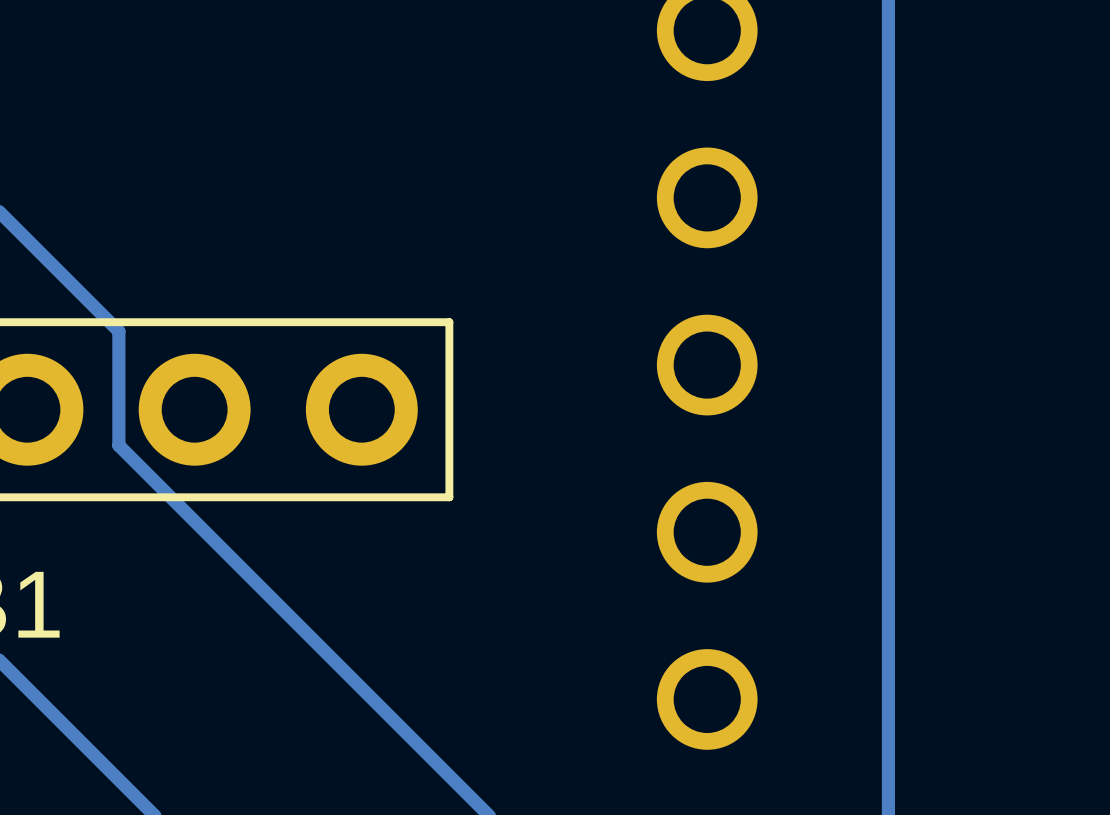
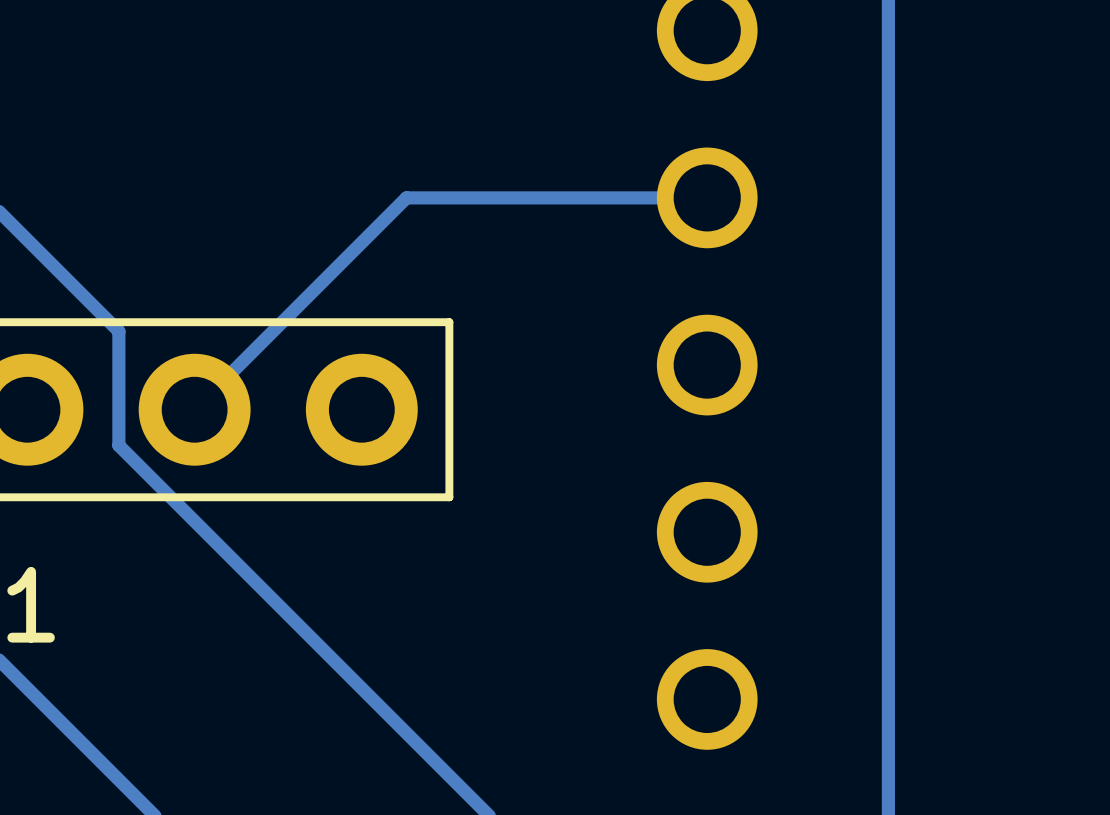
track: none -> (707, 197) (406, 197) (194, 409)

